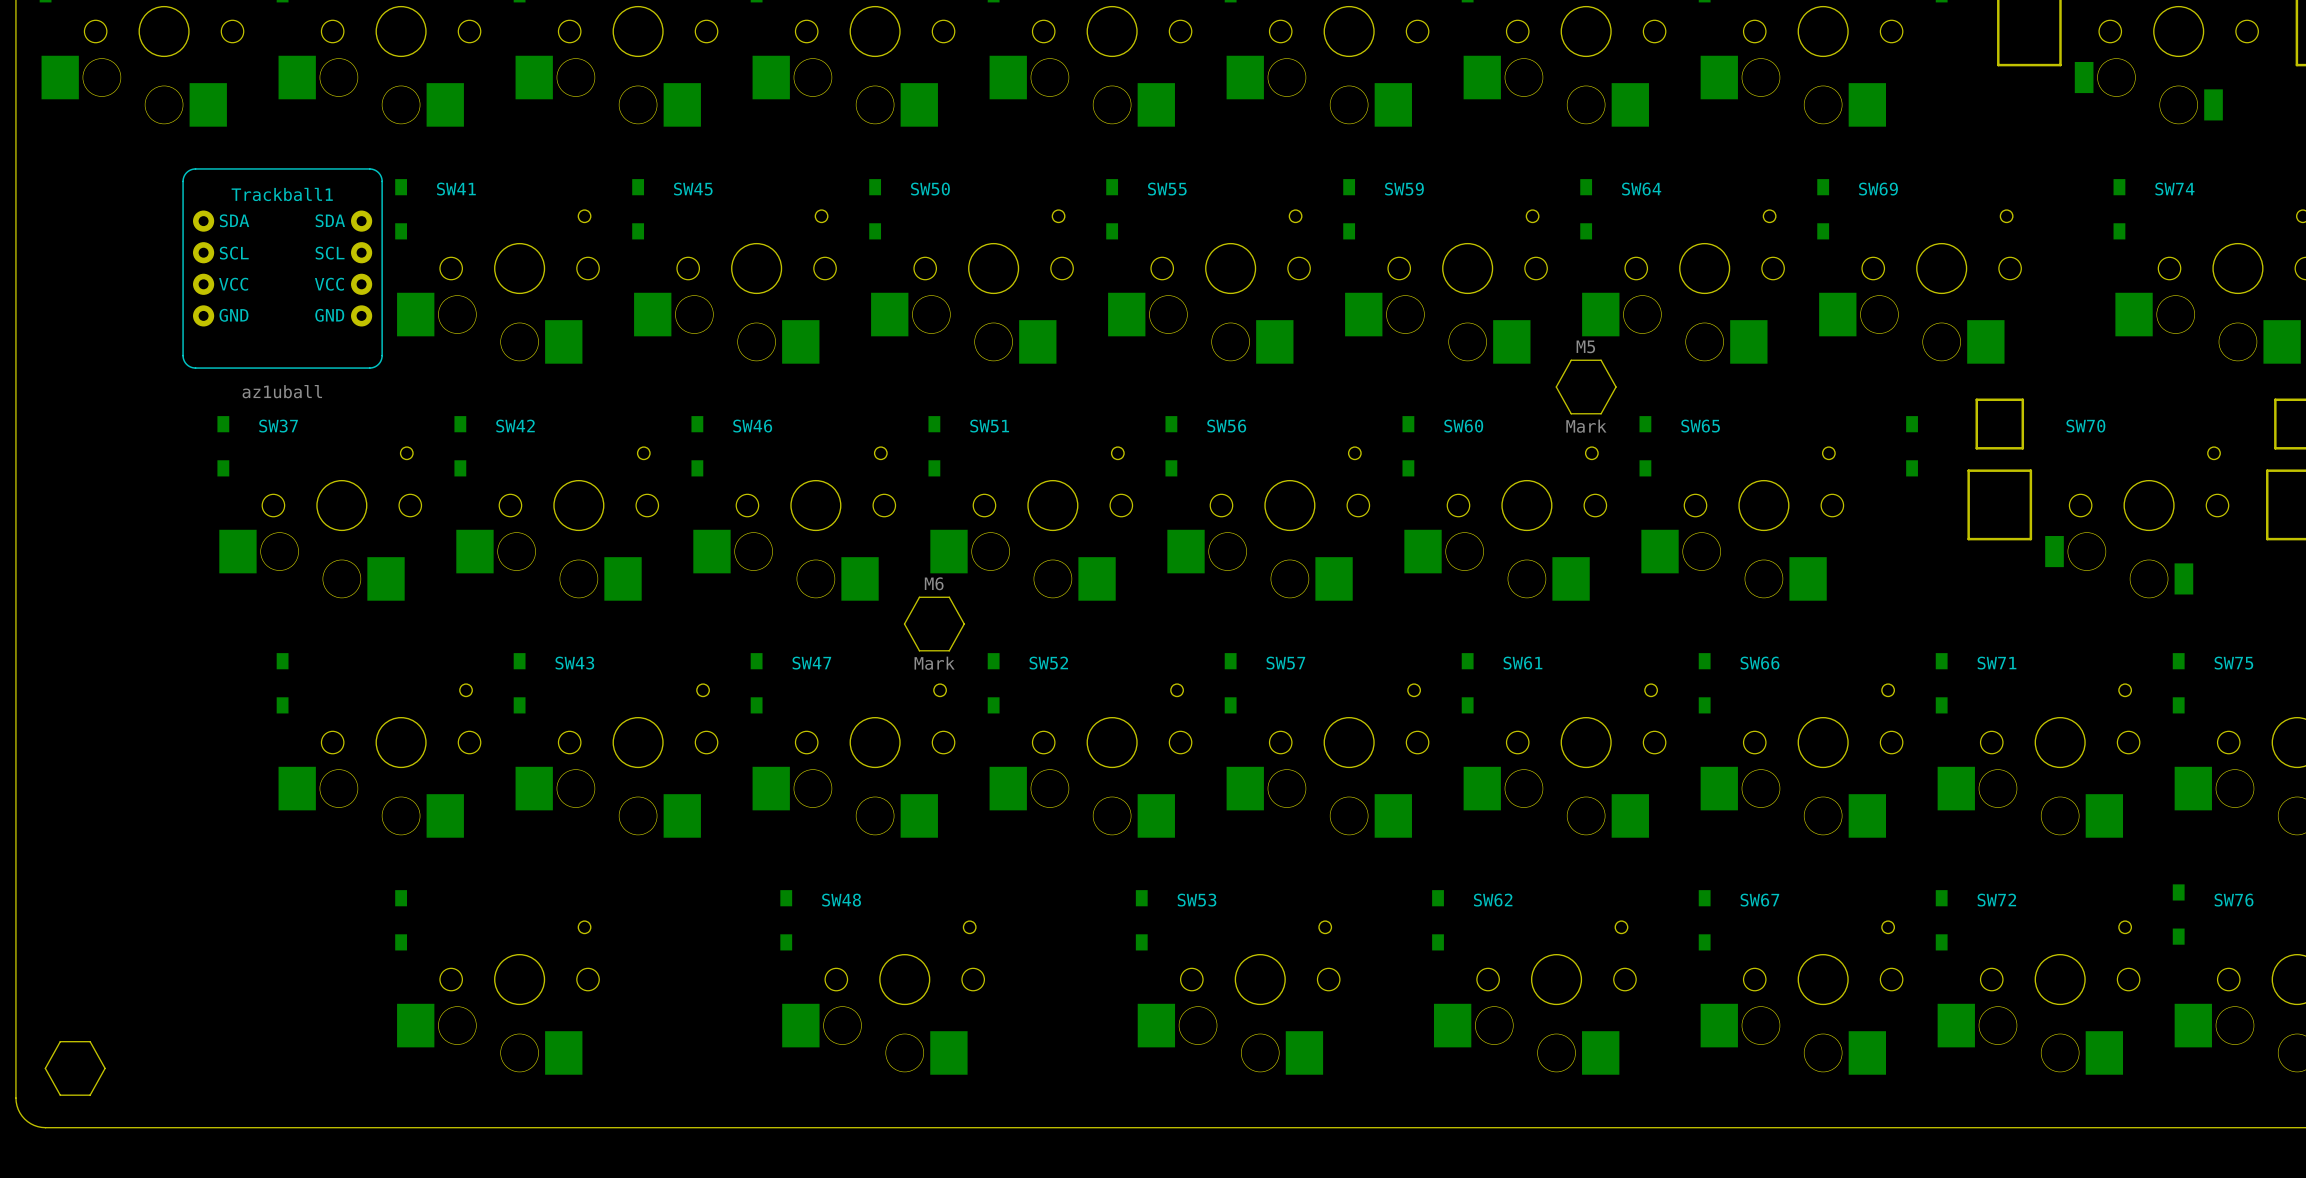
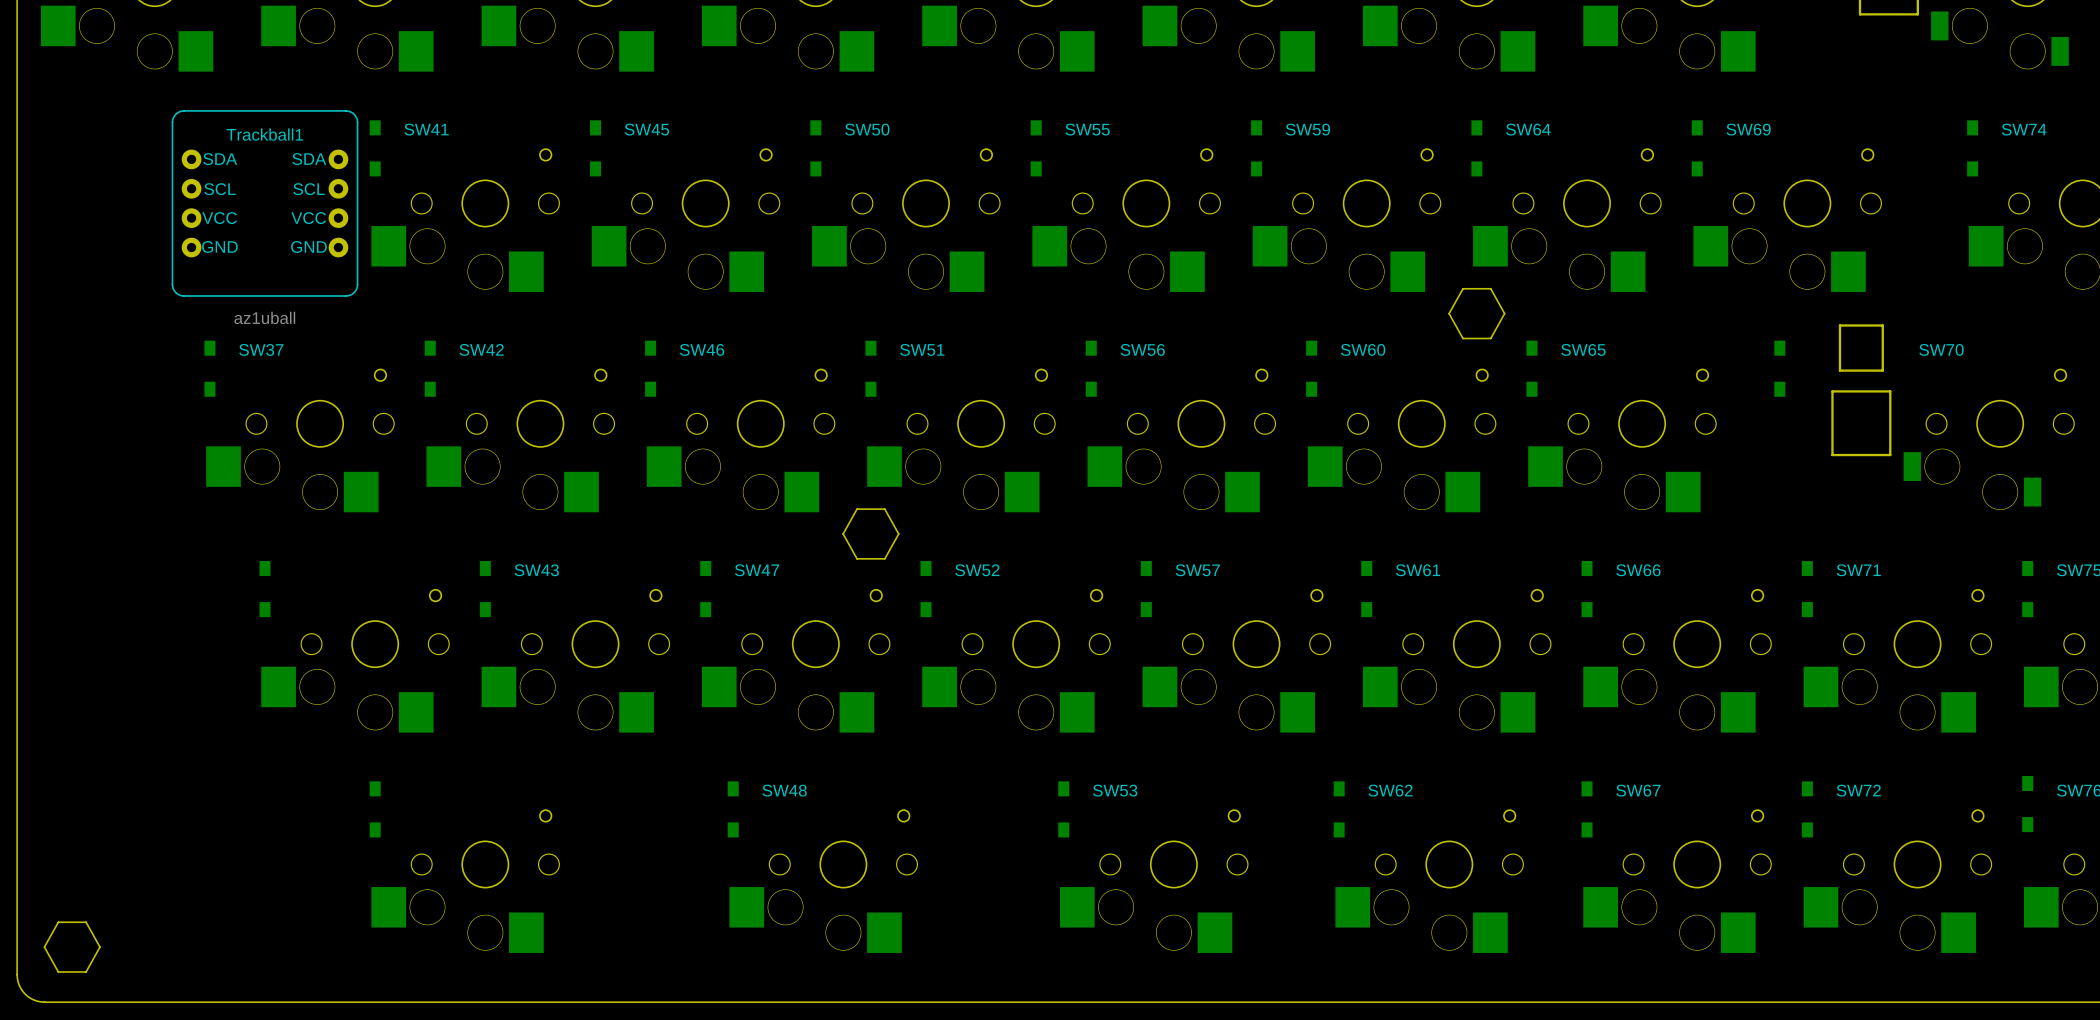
M5: Mark (1586, 387) -> none
M6: Mark (934, 624) -> none

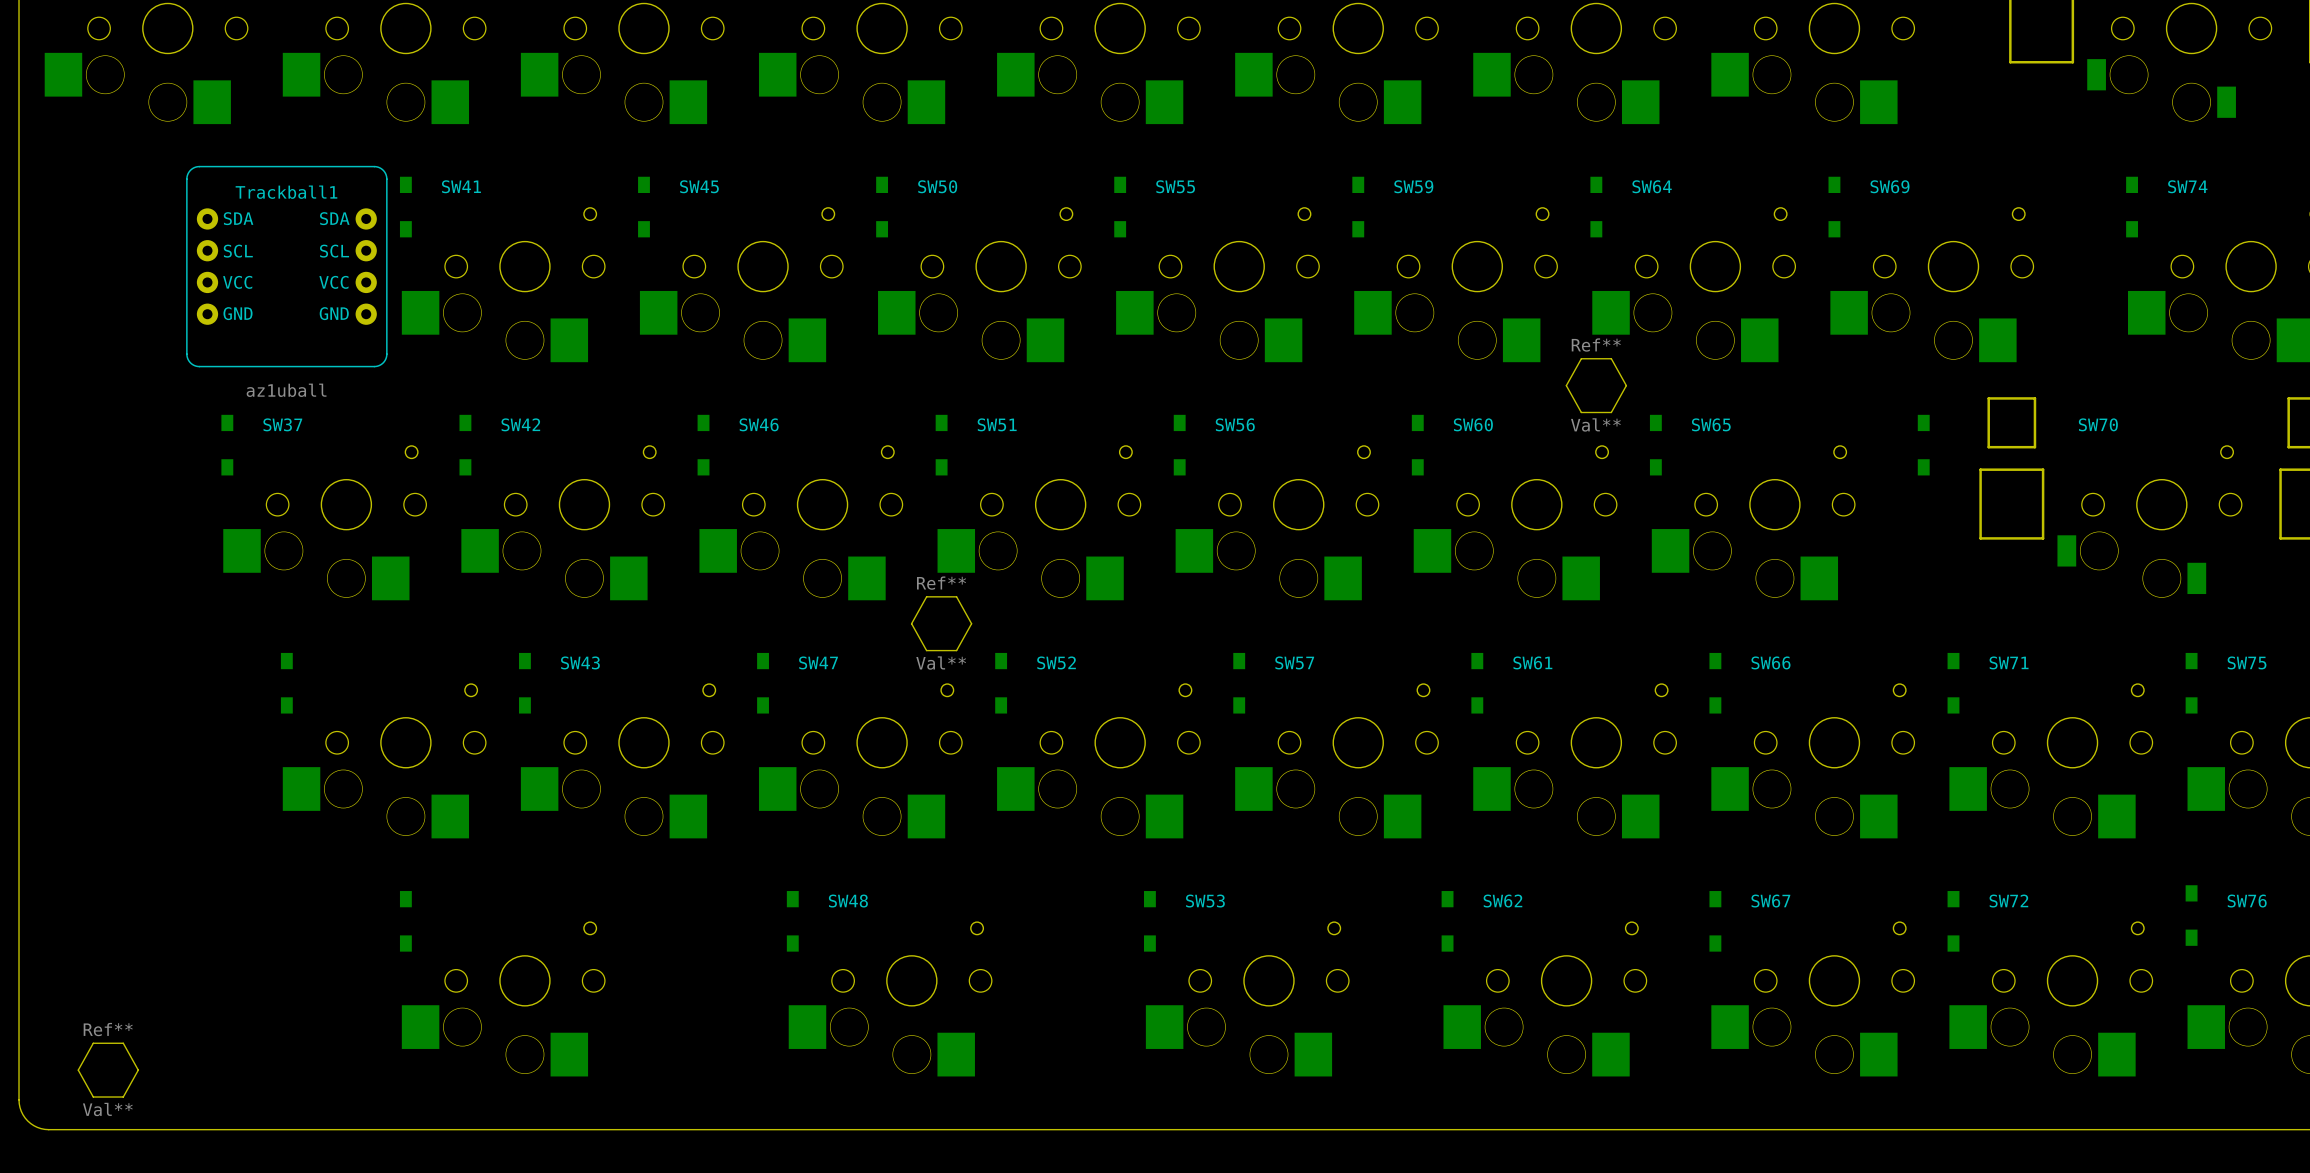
Ref**: none -> Val** (1596, 385)
Ref**: none -> Val** (941, 623)
drawing: [43, 921, 101, 973] -> none
Ref**: none -> Val** (108, 1070)

